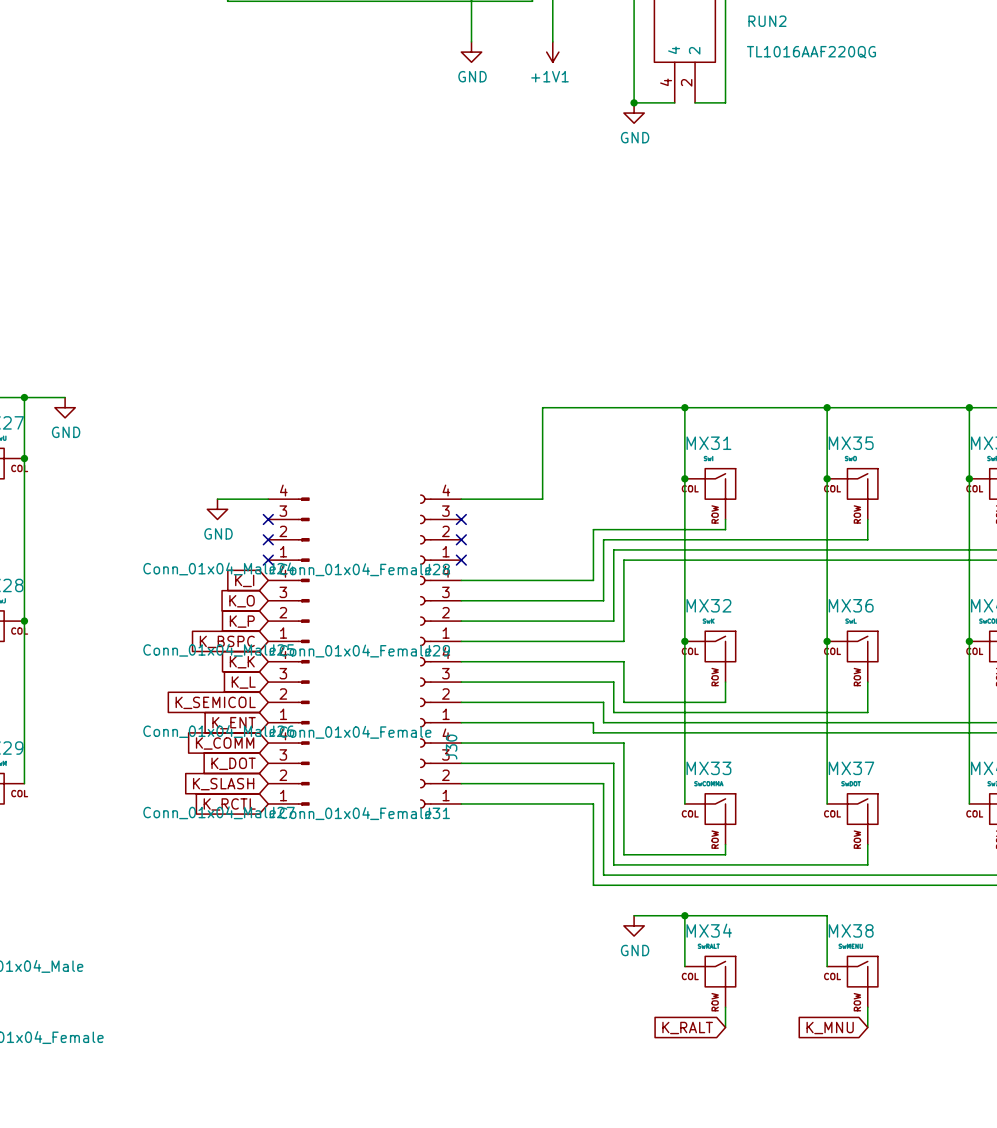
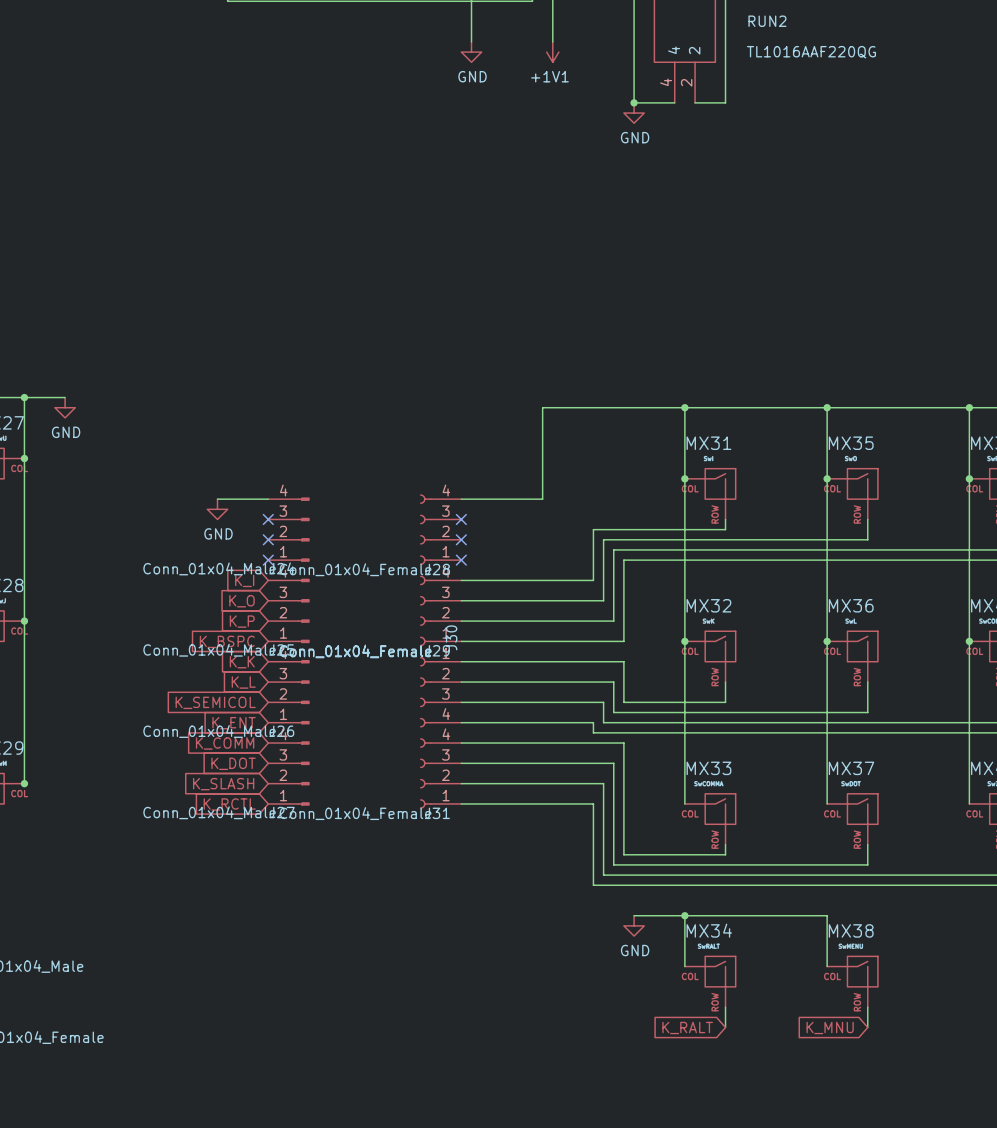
J30 flip: as is (425, 692) -> up-down (425, 692)
junction: none -> (24, 783)

